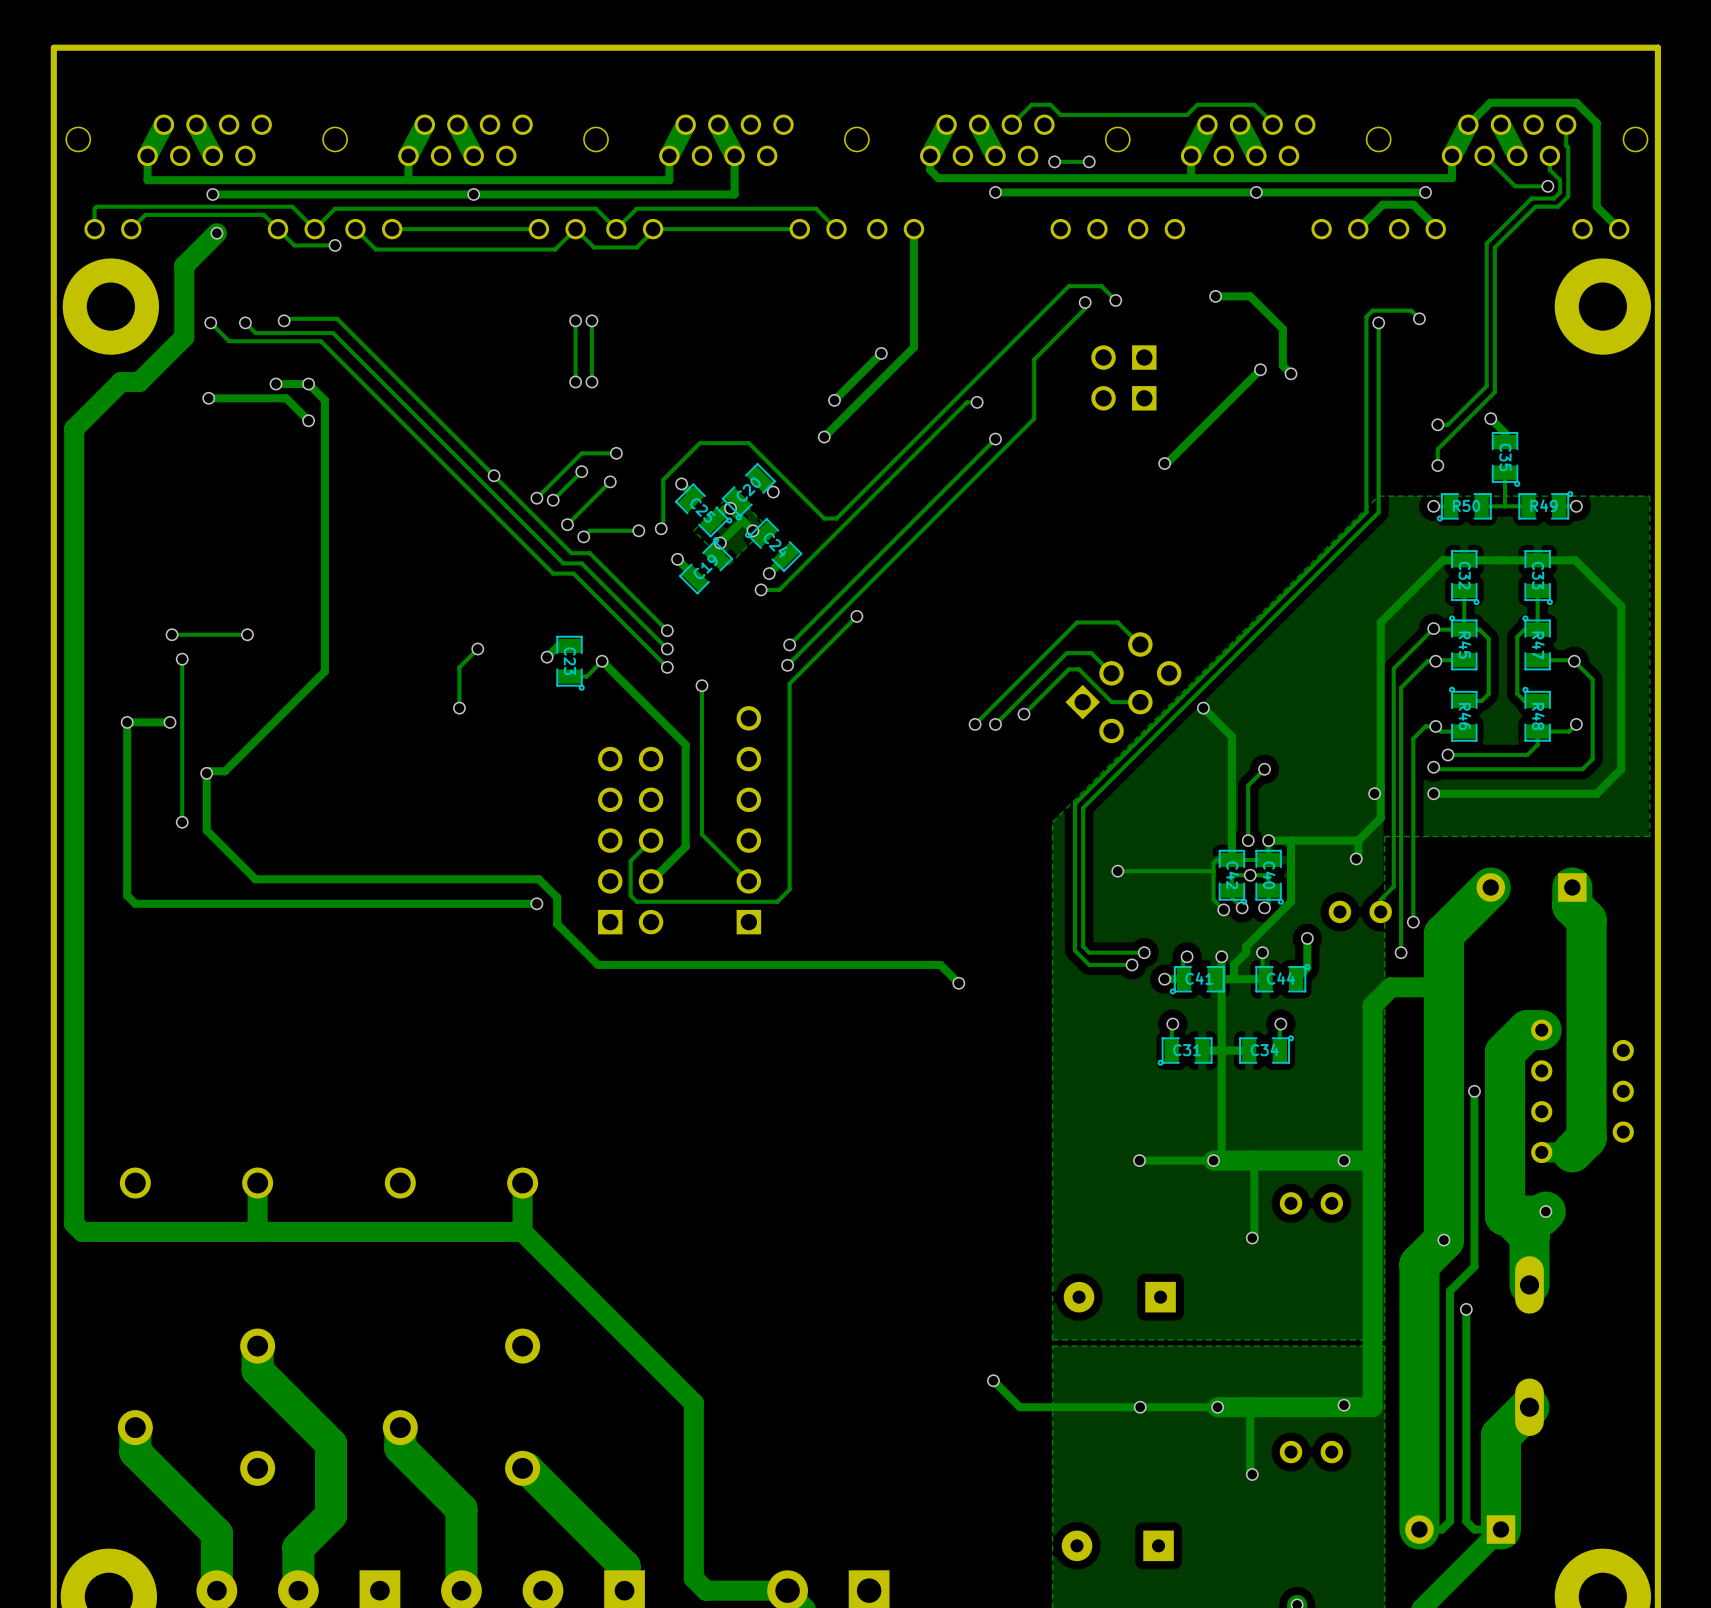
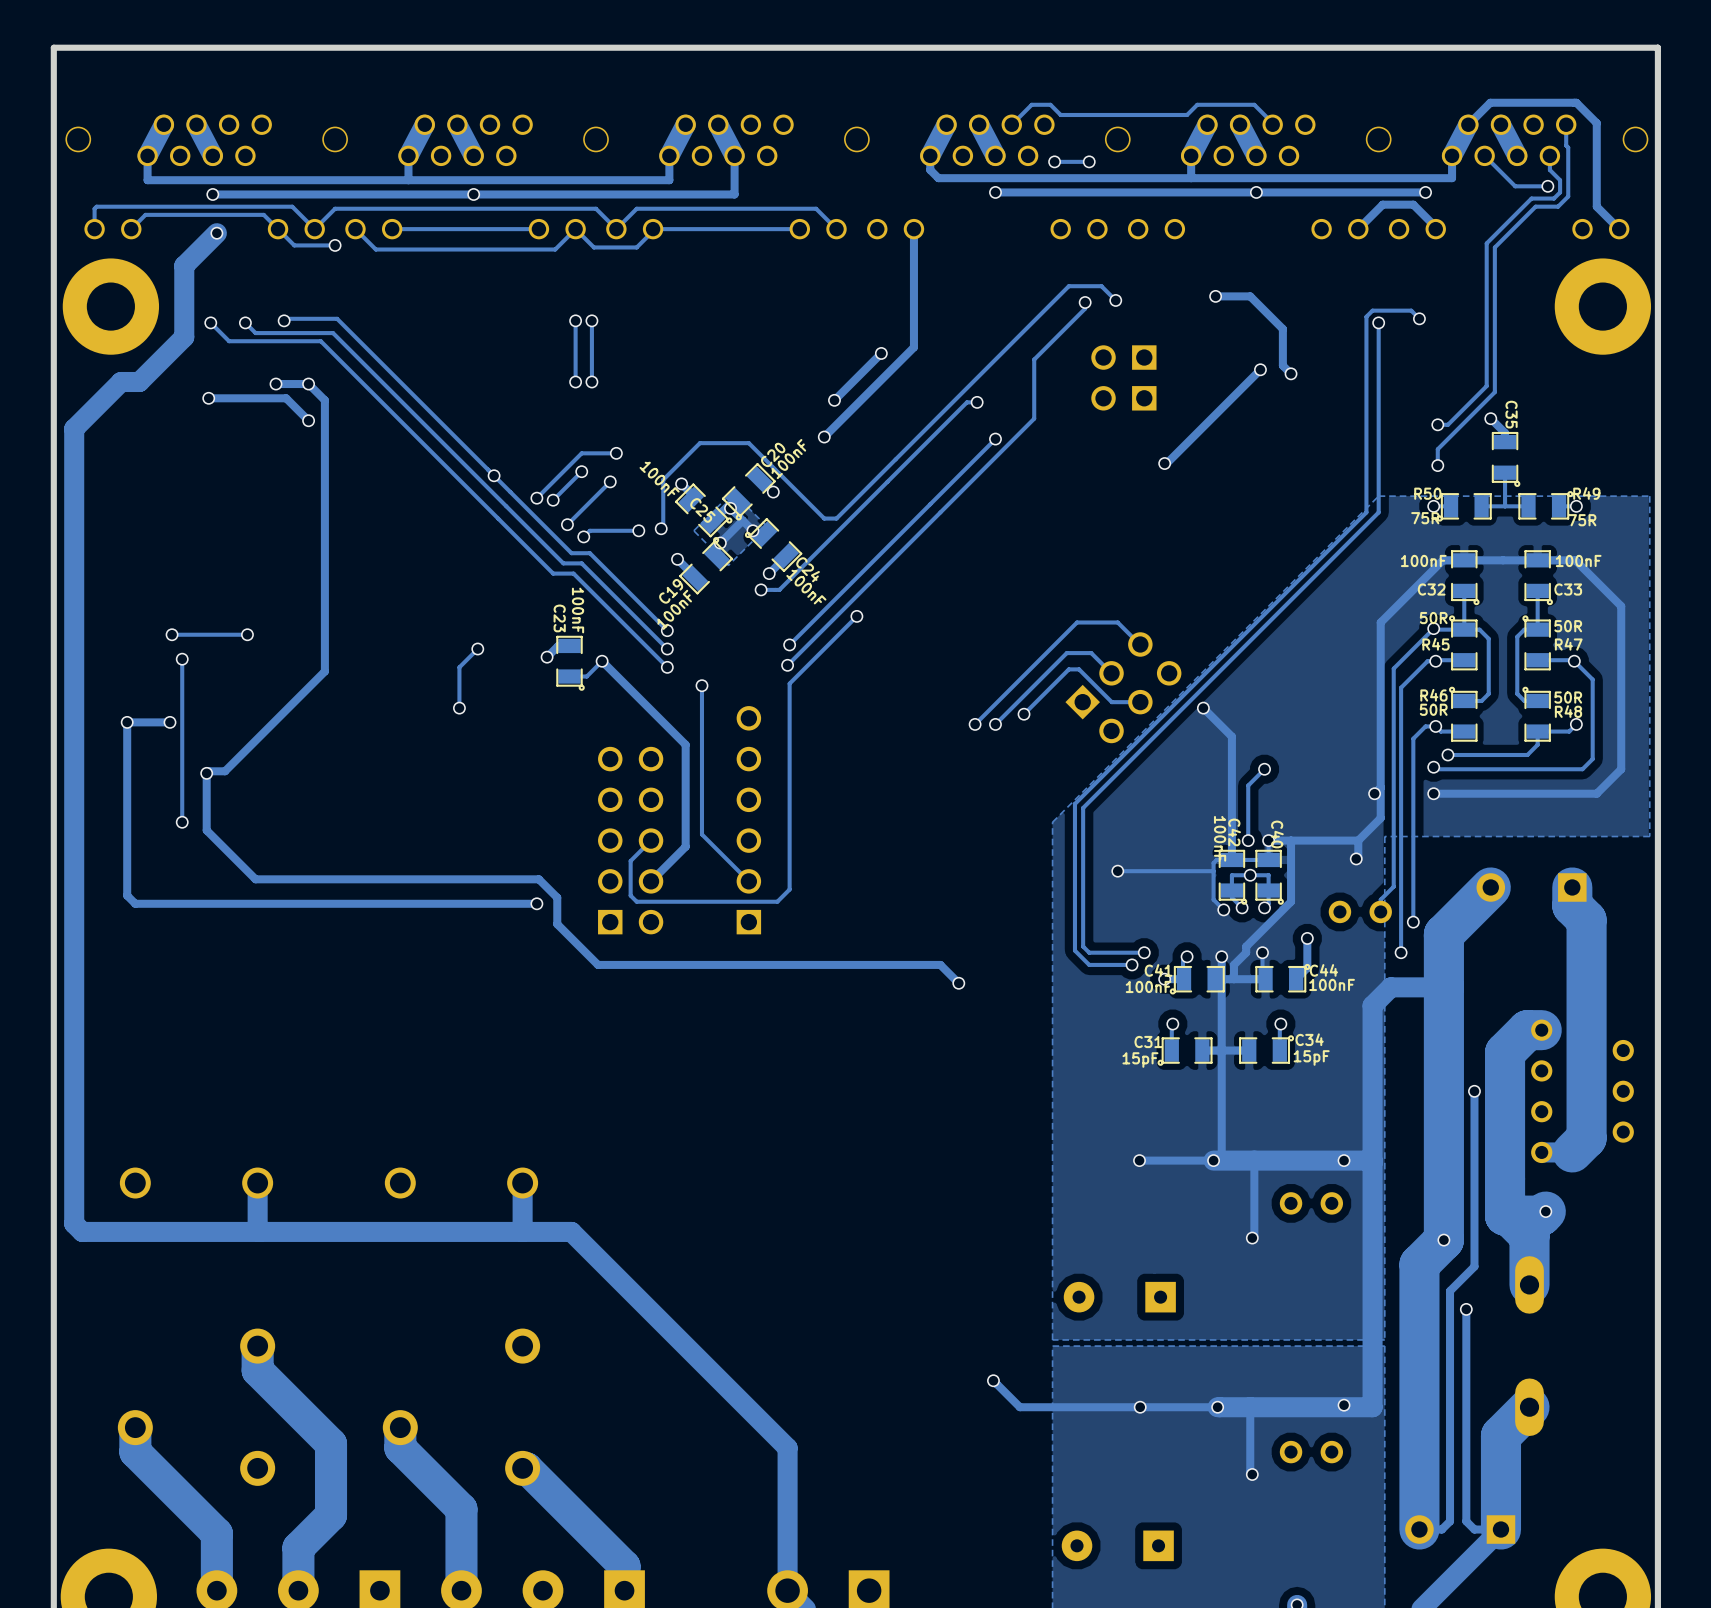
C35 name position: C35 (1505, 457) -> C35 (1511, 414)
C20 value: none -> 100nF (788, 459)
C25 value: none -> 100nF (659, 479)
C20 name position: C20 (748, 489) -> C20 (773, 454)
R50 name position: R50 (1466, 505) -> R50 (1427, 493)
R49 name position: R49 (1544, 505) -> R49 (1586, 493)
R50 value: none -> 75R (1425, 518)
R49 value: none -> 75R (1582, 520)
C24 name position: C24 (775, 545) -> C24 (808, 569)
C32 value: none -> 100nF (1423, 560)
C33 value: none -> 100nF (1578, 560)
C19 name position: C19 (705, 566) -> C19 (671, 591)
C32 name rotation: 0° (1464, 575) -> 90° counterclockwise (1431, 589)
C33 name rotation: 0° (1538, 575) -> 90° counterclockwise (1568, 589)
C24 value: none -> 100nF (806, 587)
C19 value: none -> 100nF (674, 609)
C23 value: none -> 100nF (578, 610)
R45 value: none -> 50R (1433, 618)
R47 value: none -> 50R (1568, 626)
R45 name rotation: 0° (1464, 645) -> 90° counterclockwise (1435, 644)
R47 name rotation: 0° (1538, 645) -> 90° counterclockwise (1568, 644)
C23 name position: C23 (569, 661) -> C23 (559, 618)
R48 value: none -> 50R (1568, 697)
R46 value: none -> 50R (1433, 709)
R46 name rotation: 0° (1464, 716) -> 90° counterclockwise (1433, 695)
R46 name position: R46 (1464, 716) -> R46 (1433, 695)
R48 name rotation: 0° (1538, 716) -> 90° counterclockwise (1568, 711)
C42 value: none -> 100nF (1220, 838)
C42 name position: C42 (1232, 875) -> C42 (1234, 832)
C40 name position: C40 (1269, 875) -> C40 (1277, 834)
C41 name position: C41 (1199, 978) -> C41 (1158, 970)
C44 name position: C44 (1281, 978) -> C44 (1323, 970)
C44 value: none -> 100nF (1332, 984)
C41 value: none -> 100nF (1148, 986)
C34 name position: C34 (1264, 1049) -> C34 (1309, 1039)
C31 name position: C31 (1187, 1050) -> C31 (1148, 1042)
C34 value: none -> 15pF (1311, 1057)
C31 value: none -> 15pF (1140, 1060)
track: (522, 1231) (693, 1403) (693, 1578) (706, 1590) (787, 1590) -> (522, 1231) (571, 1231) (787, 1447) (787, 1590)

